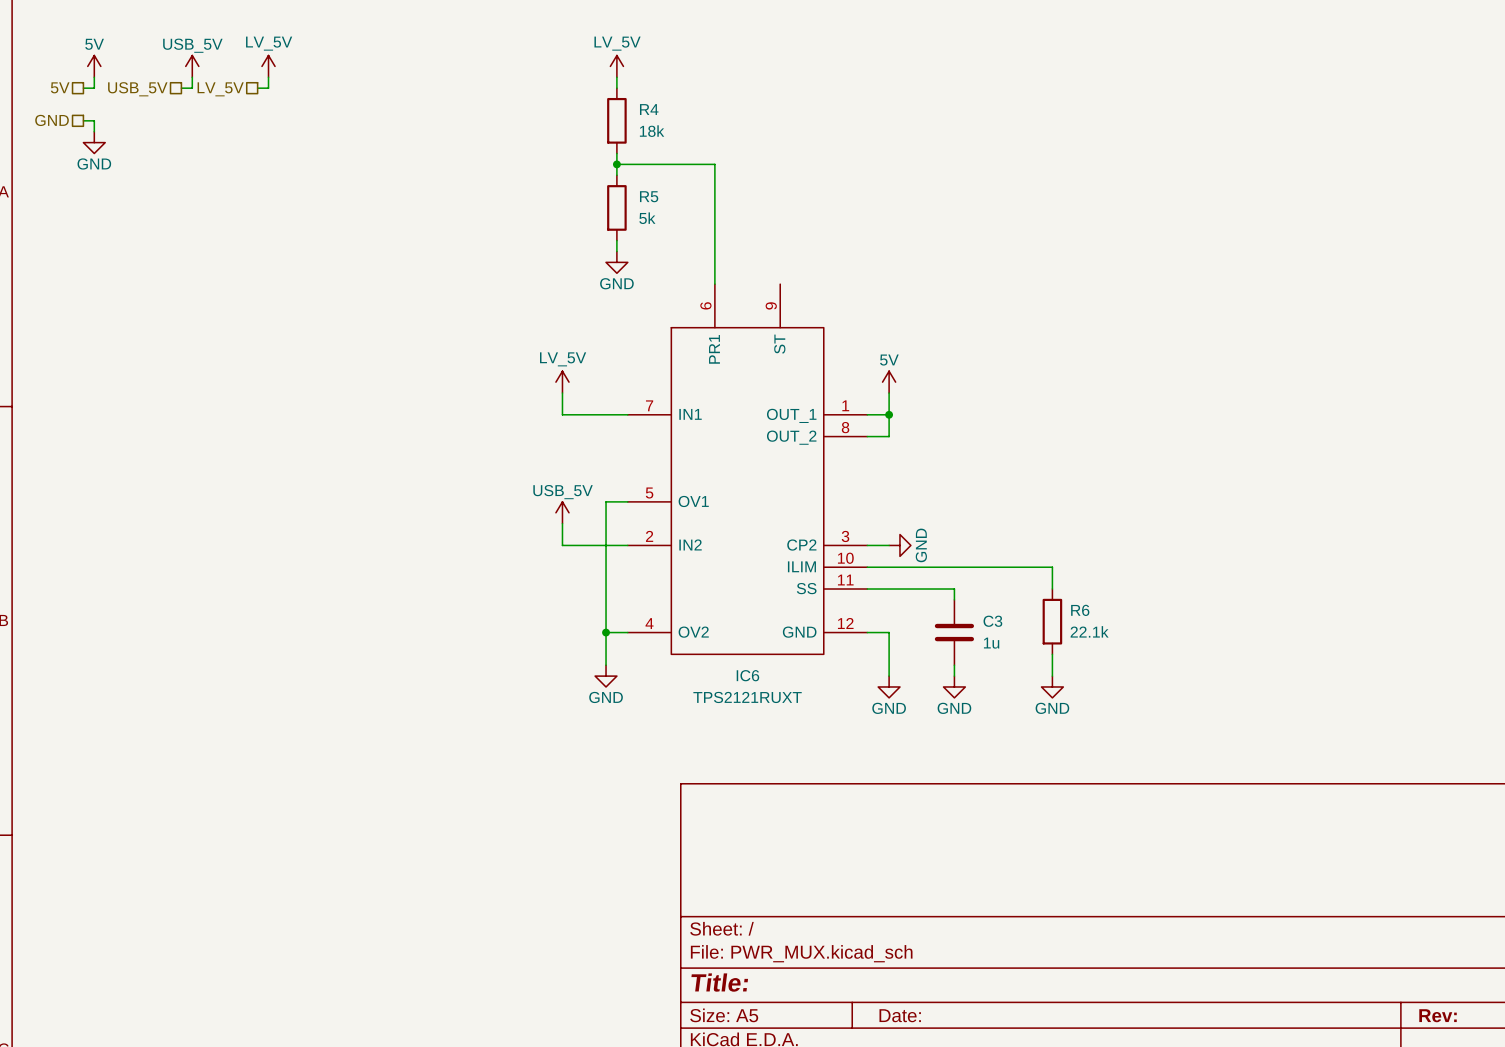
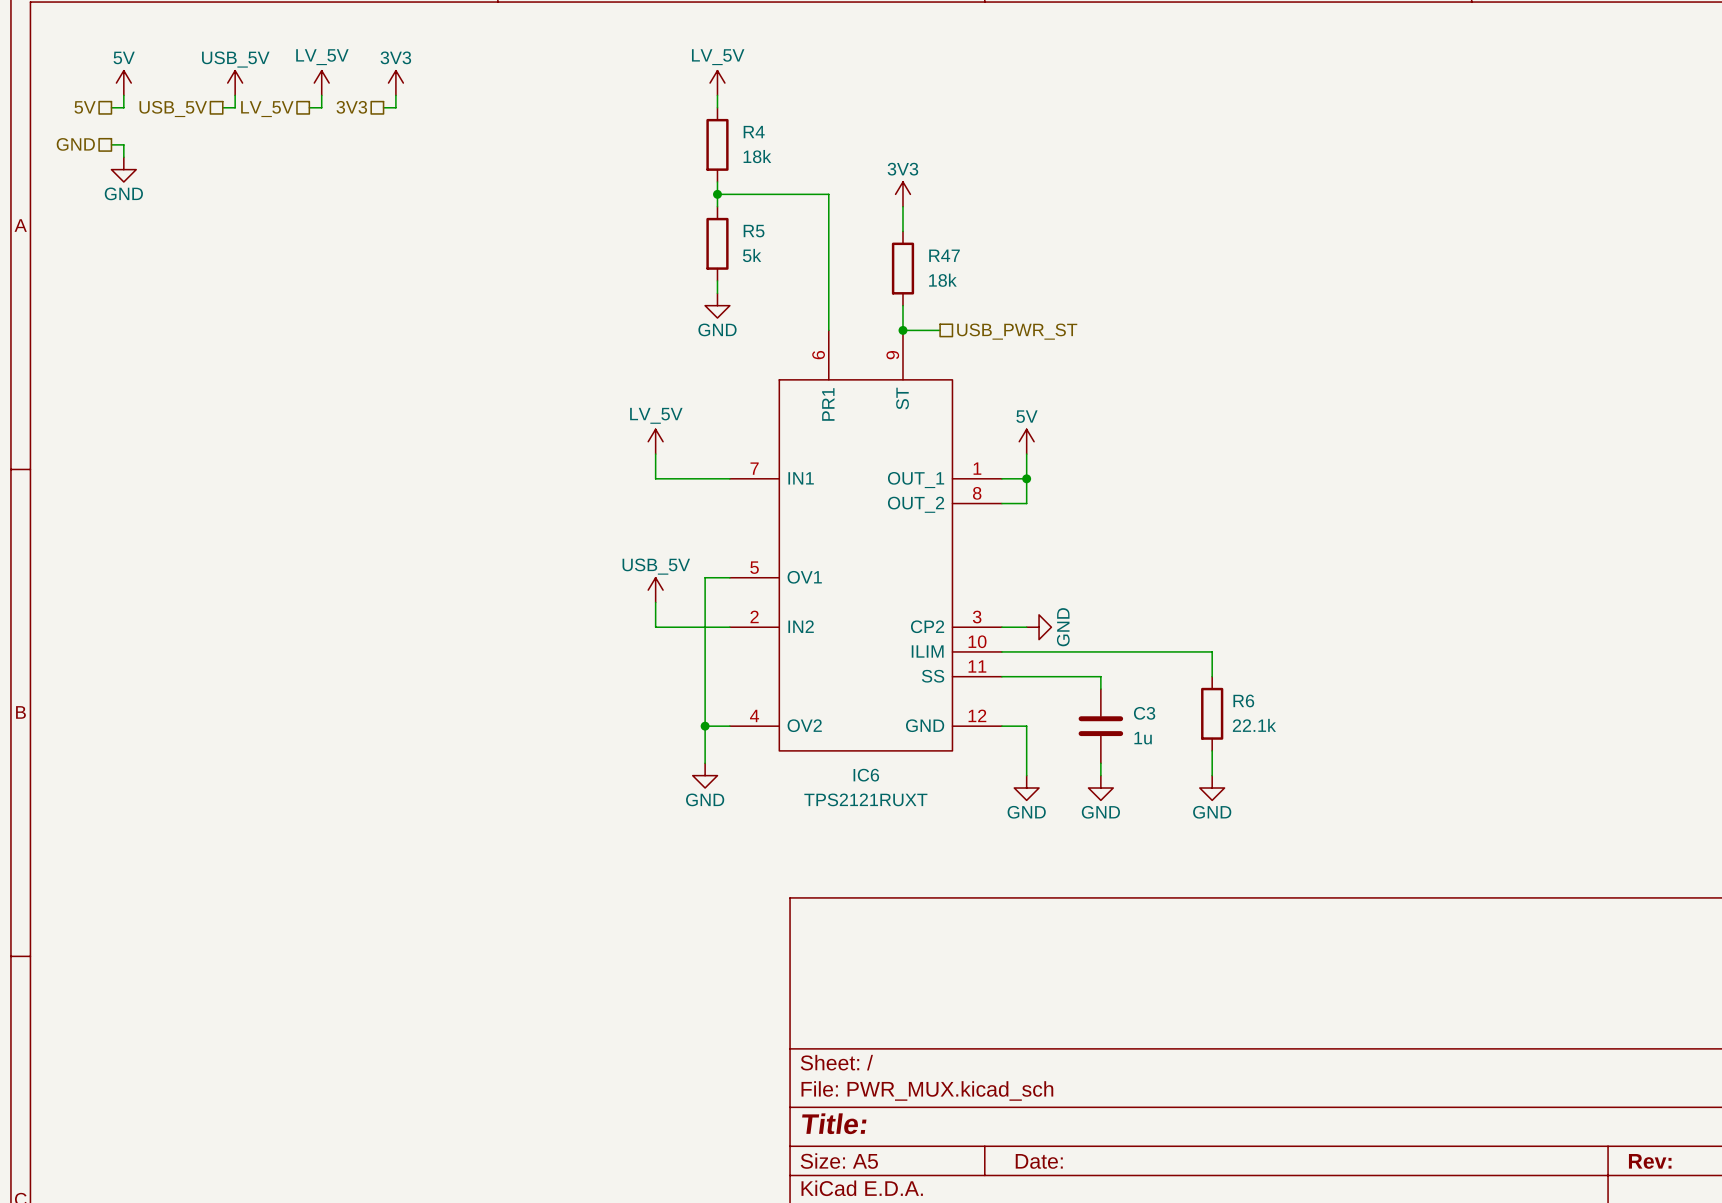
power symbol: none -> 3V3 (395, 83)
wire: none -> (395, 95) (395, 107) (383, 107)
hierarchical label: none -> 3V3 (351, 107)
power symbol: none -> 3V3 (902, 194)
wire: none -> (902, 206) (902, 231)
R47: none -> 18k (902, 268)
wire: none -> (902, 305) (902, 330) (940, 330)
junction: none -> (902, 330)
hierarchical label: none -> USB_PWR_ST (1017, 331)

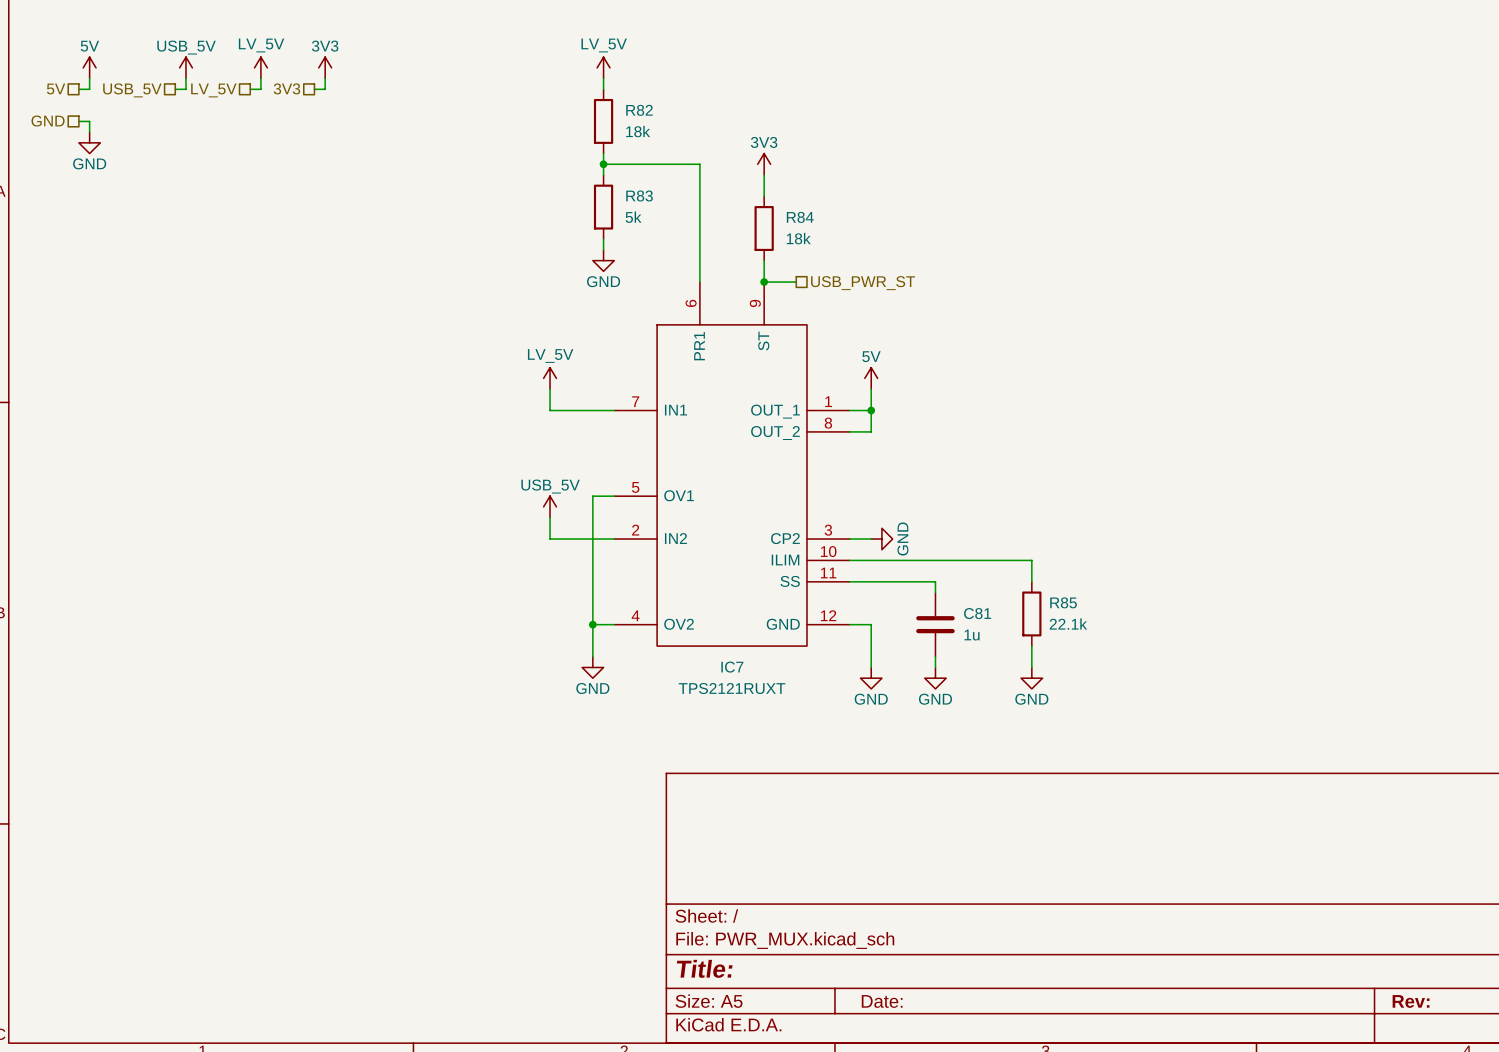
R4 name: R4 (754, 132) -> R82 (639, 110)
R5 name: R5 (754, 231) -> R83 (639, 195)
R47 name: R47 (944, 255) -> R84 (800, 217)
R6 name: R6 (1243, 700) -> R85 (1063, 602)
C3 name: C3 (1144, 713) -> C81 (977, 613)
IC6 name: IC6 (866, 775) -> IC7 (732, 667)

